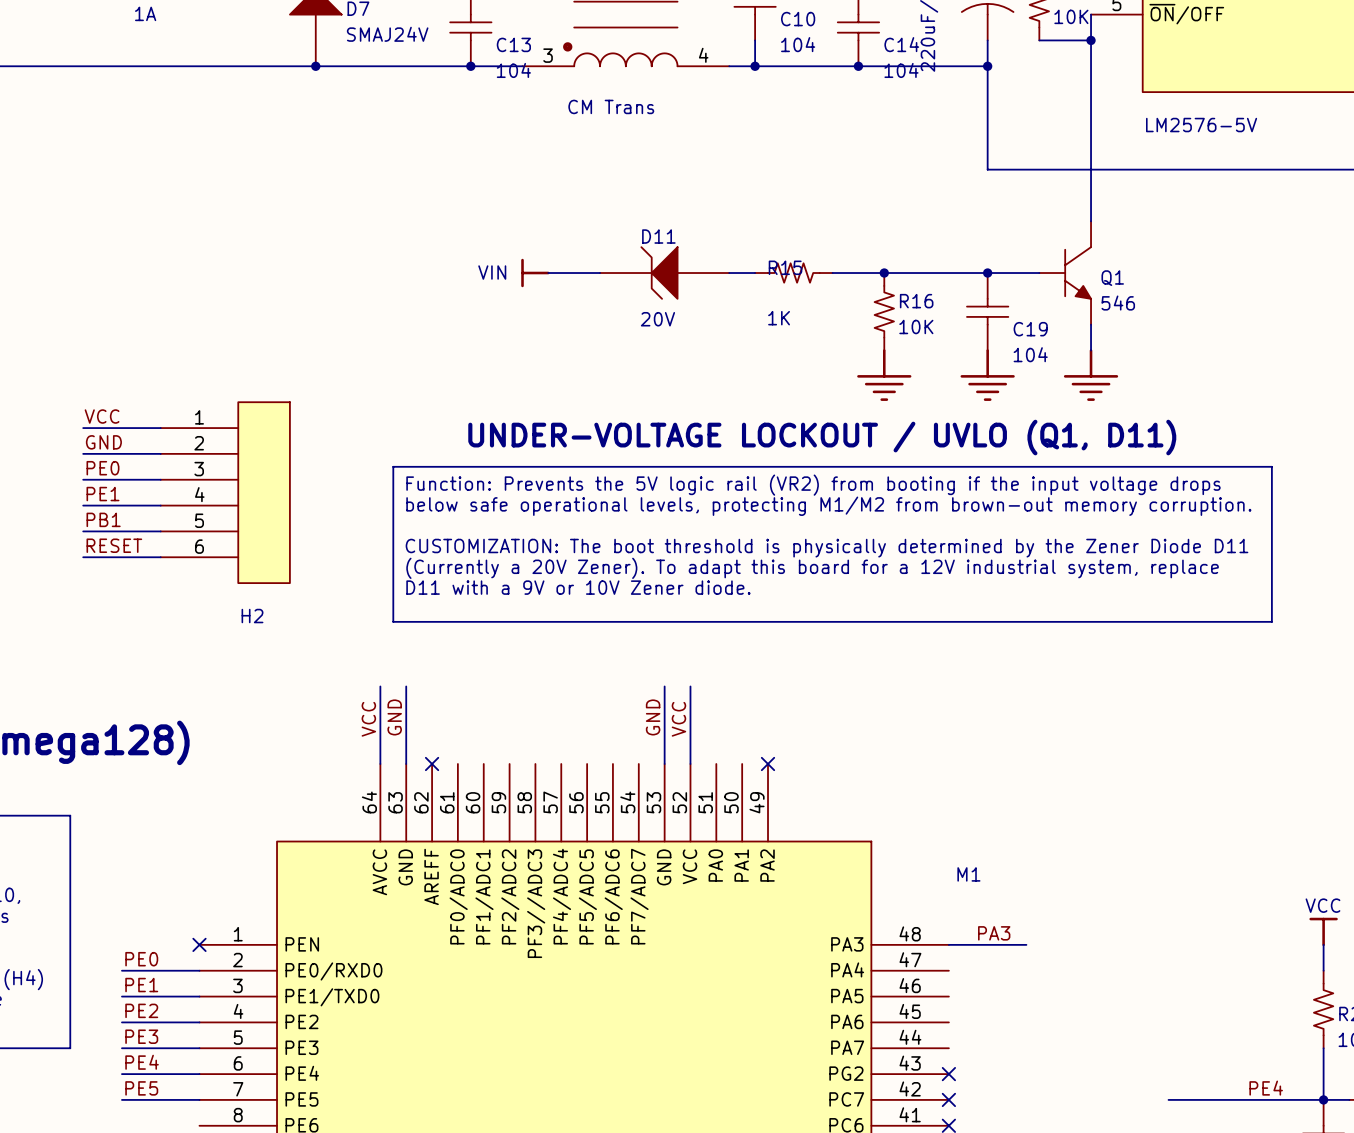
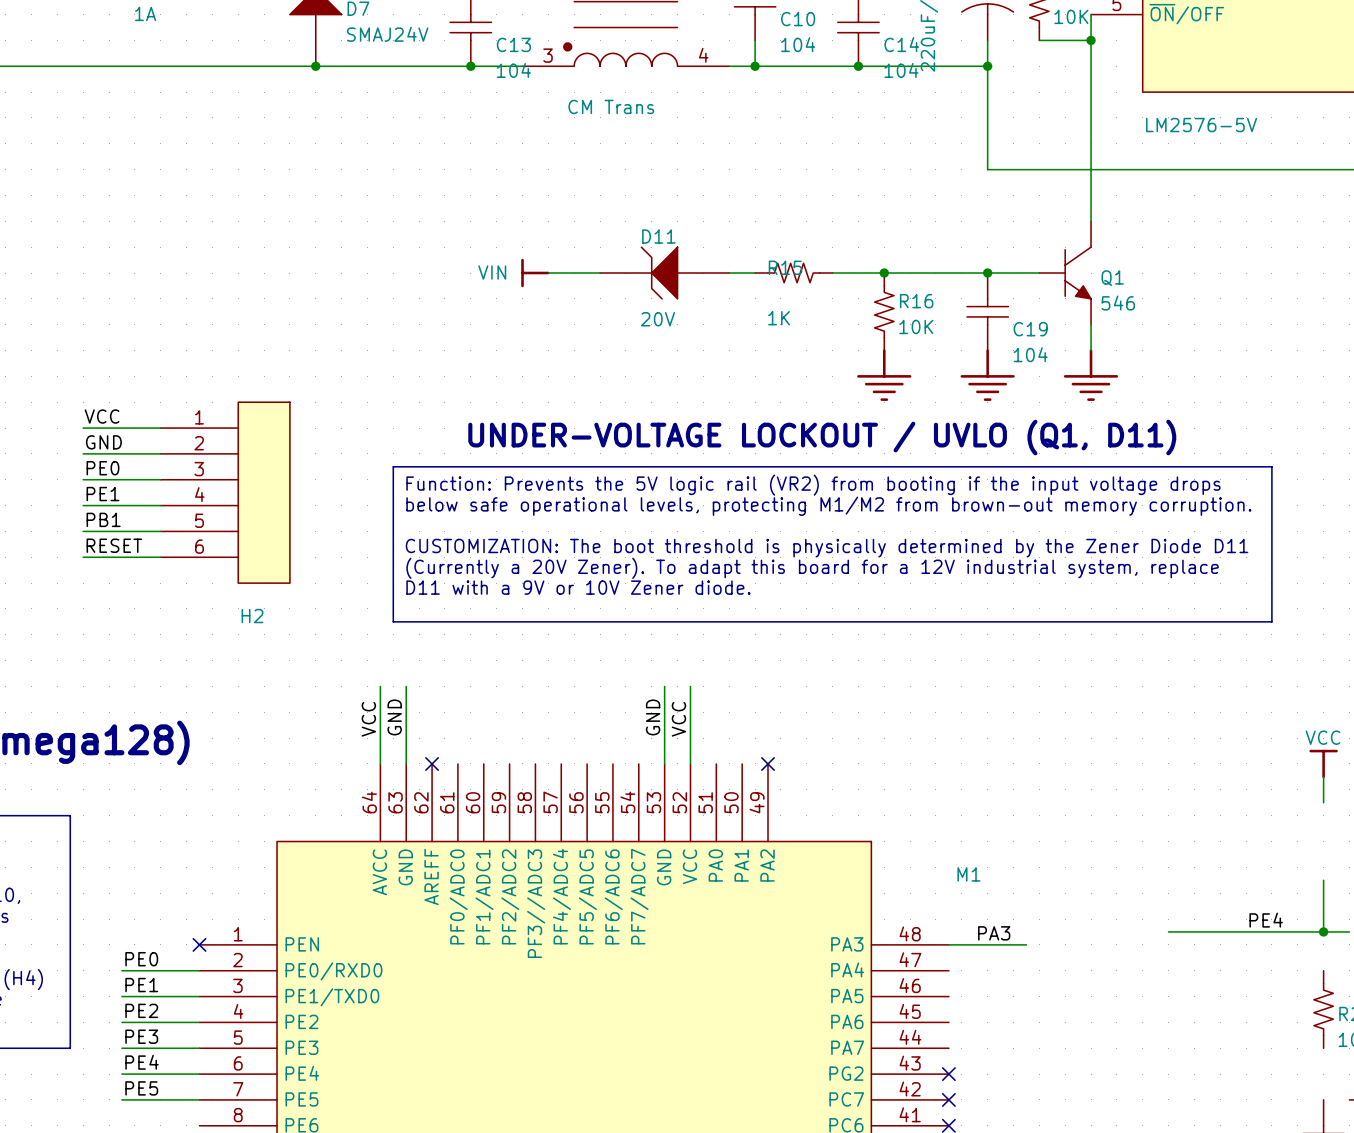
junction: none -> (1323, 931)
power symbol position: VCC (1323, 931) -> VCC (1323, 763)
wire: (1323, 944) (1323, 970) -> (1323, 776) (1323, 802)
wire: (1323, 1048) (1323, 1099) -> (1323, 880) (1323, 931)
label position: PE4 (1266, 1088) -> PE4 (1266, 920)
wire: (1168, 1099) (1349, 1099) -> (1168, 931) (1349, 931)
junction: (1323, 1099) -> none

